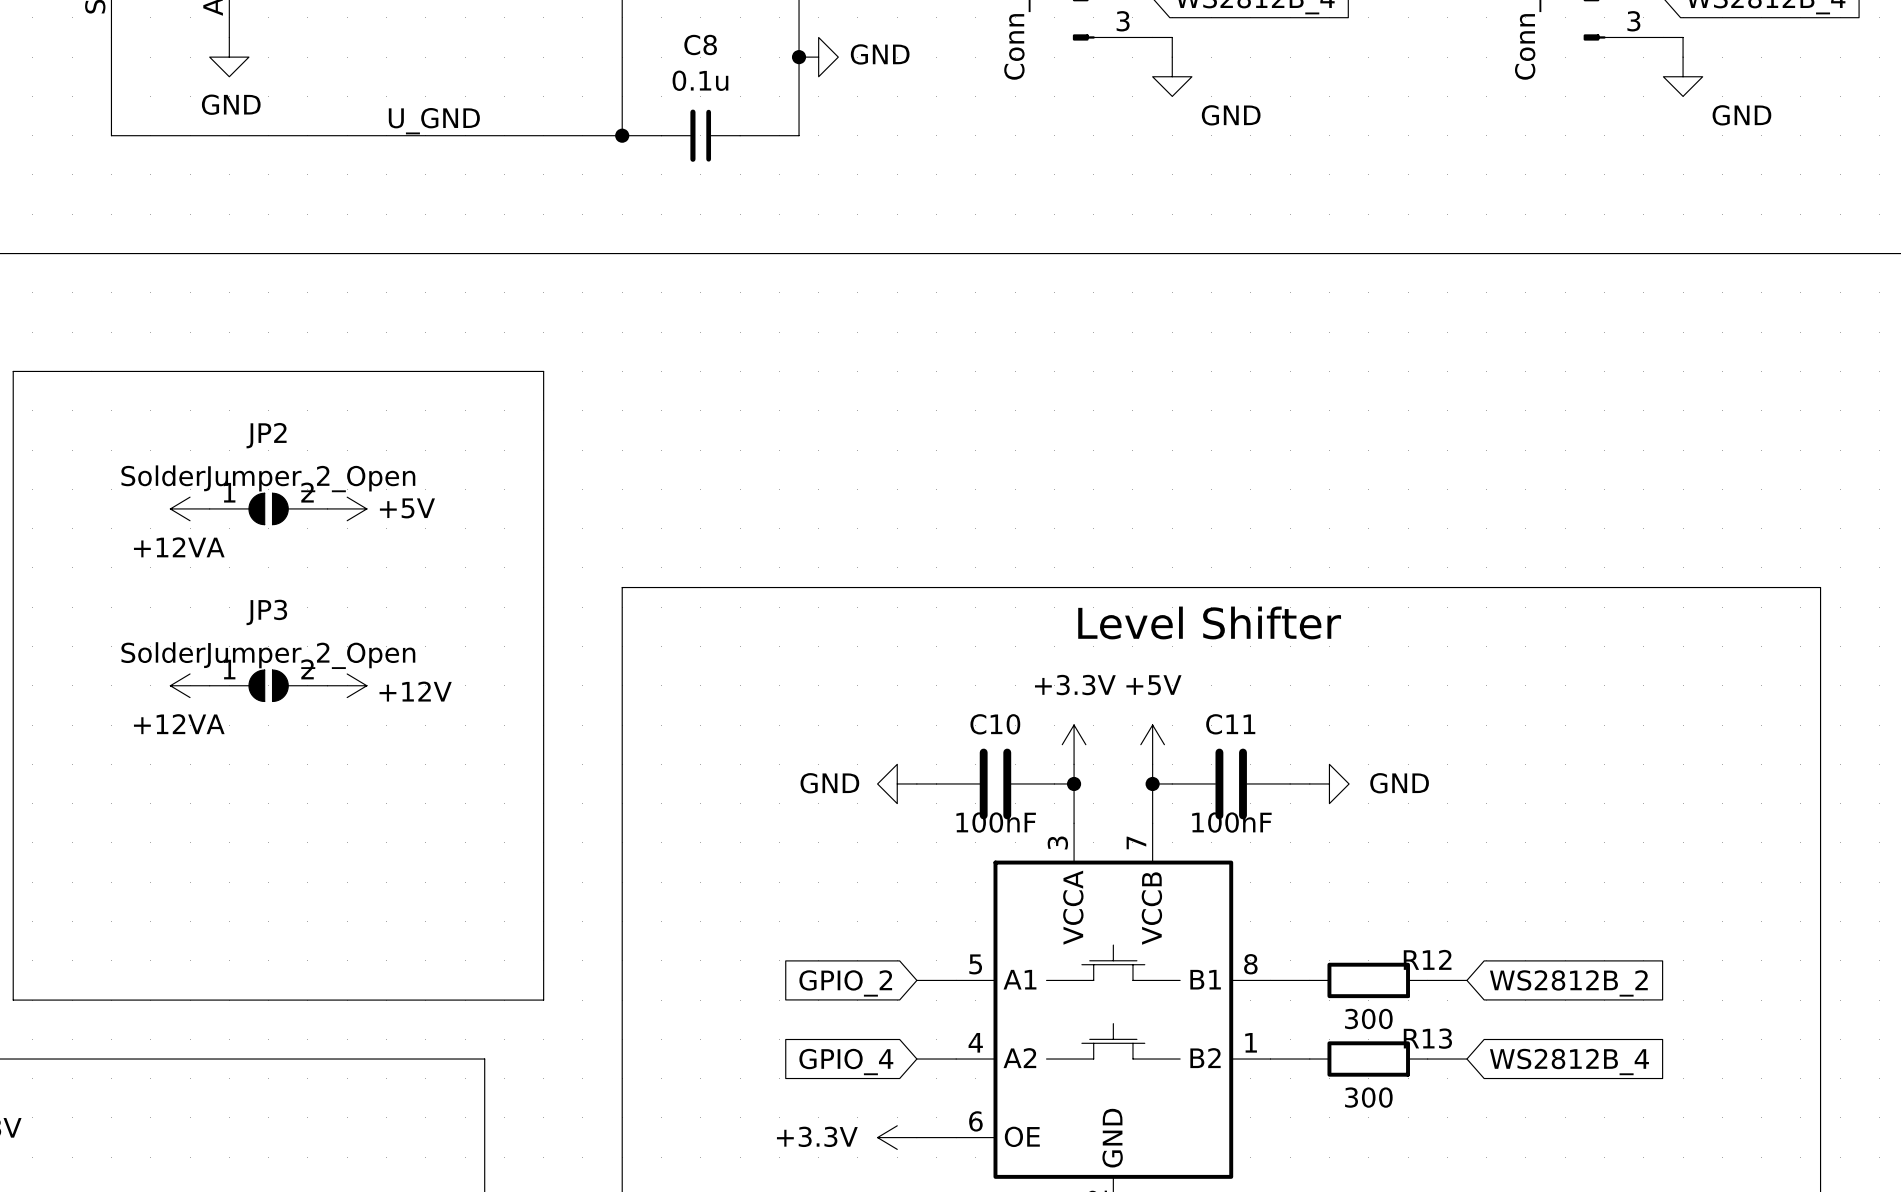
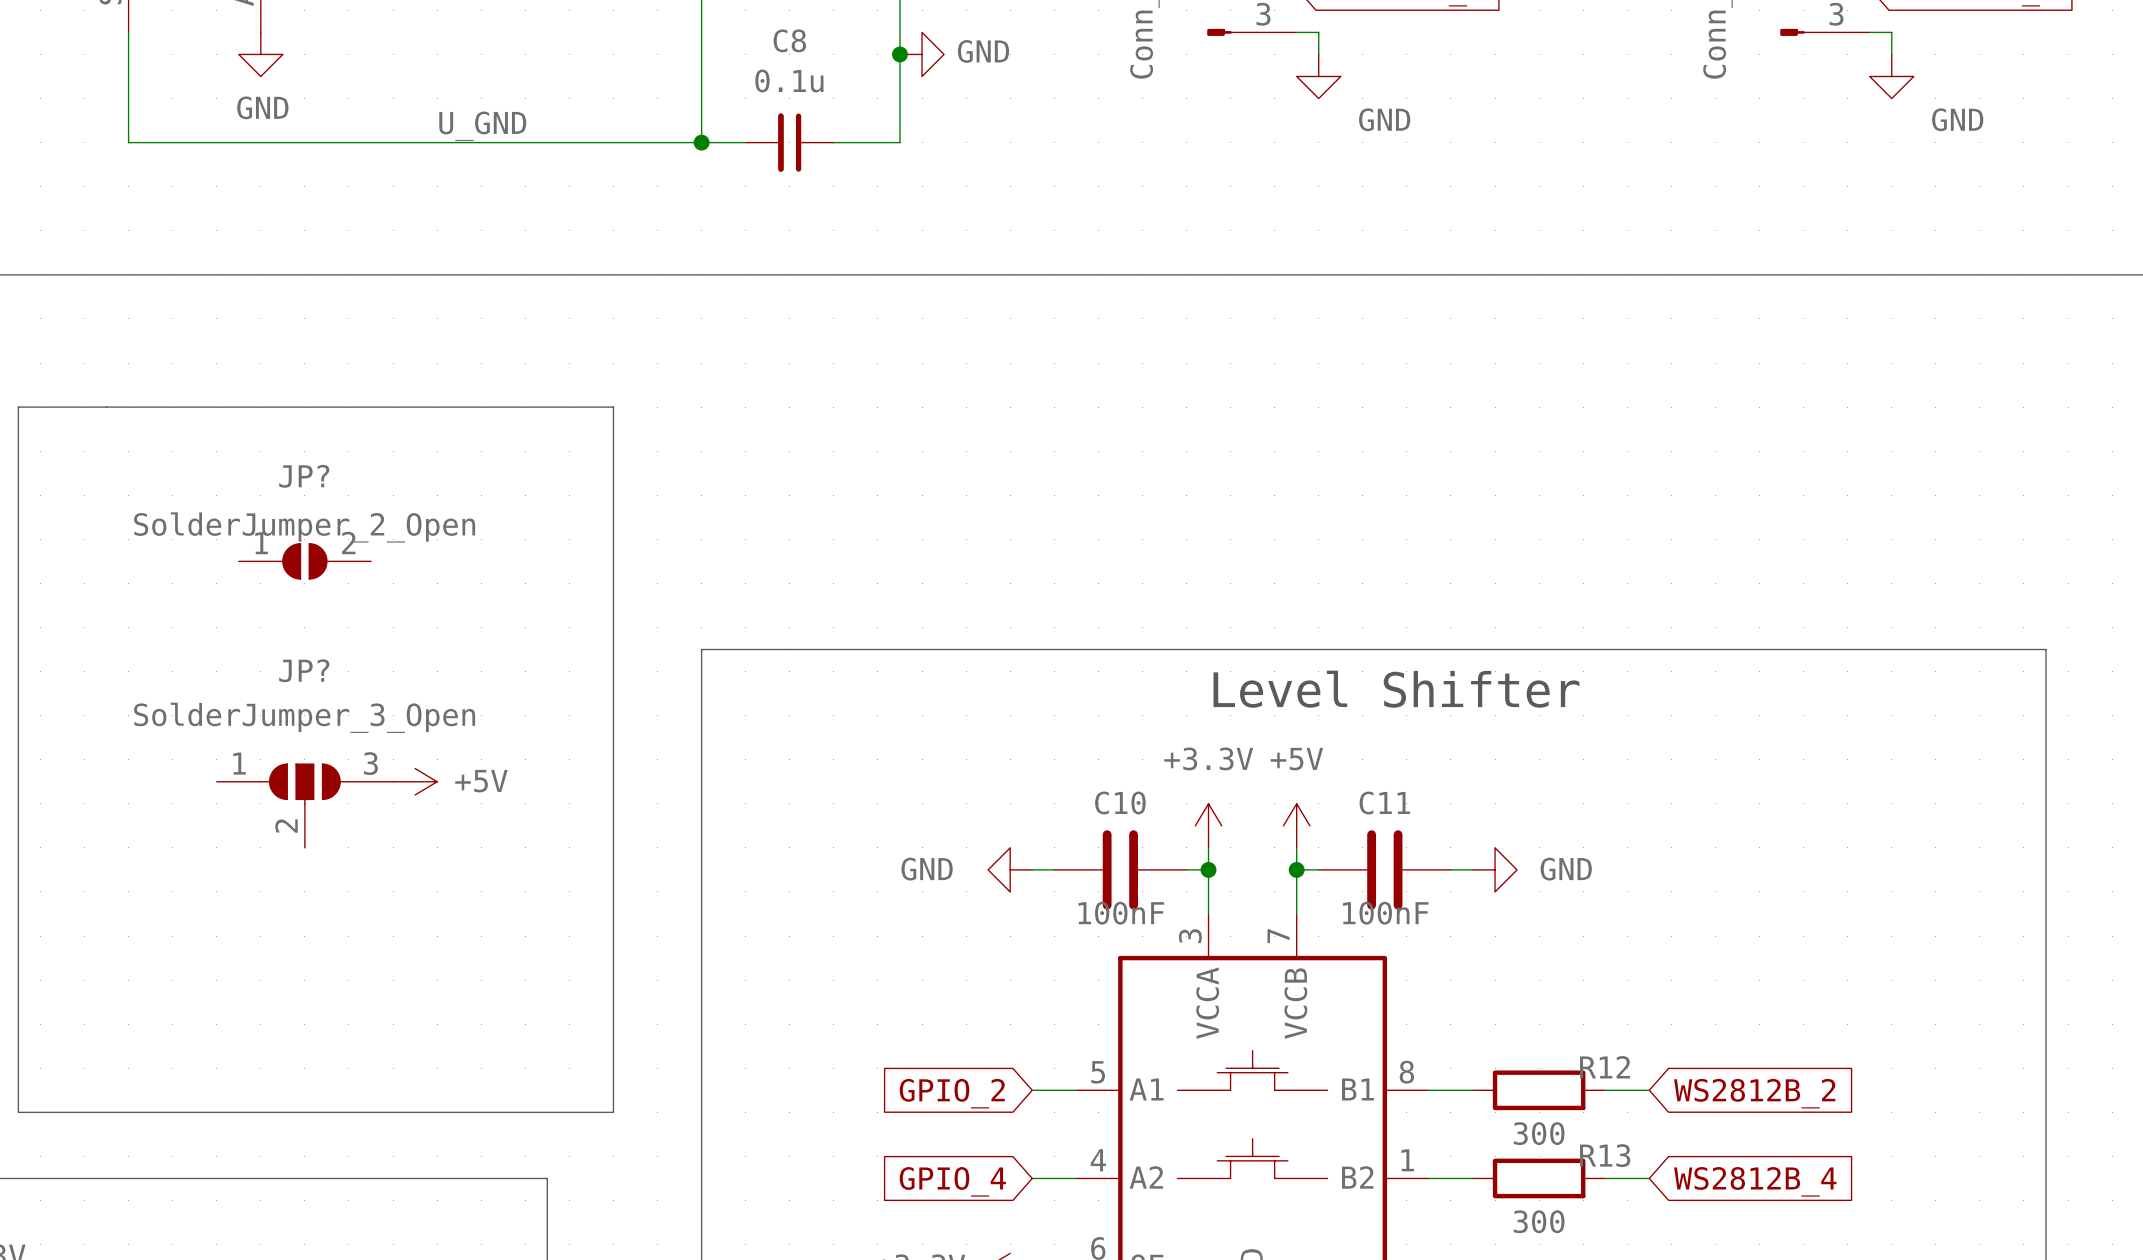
JP2 name: JP2 (266, 435) -> JP? (304, 476)
power symbol: +12VA (190, 508) -> none
power symbol position: +5V (347, 508) -> +5V (415, 781)
power symbol: +12VA (190, 685) -> none
JP3: SolderJumper_2_Open (268, 685) -> none
power symbol: +12V (347, 685) -> none
JP?: none -> SolderJumper_3_Open (304, 806)

